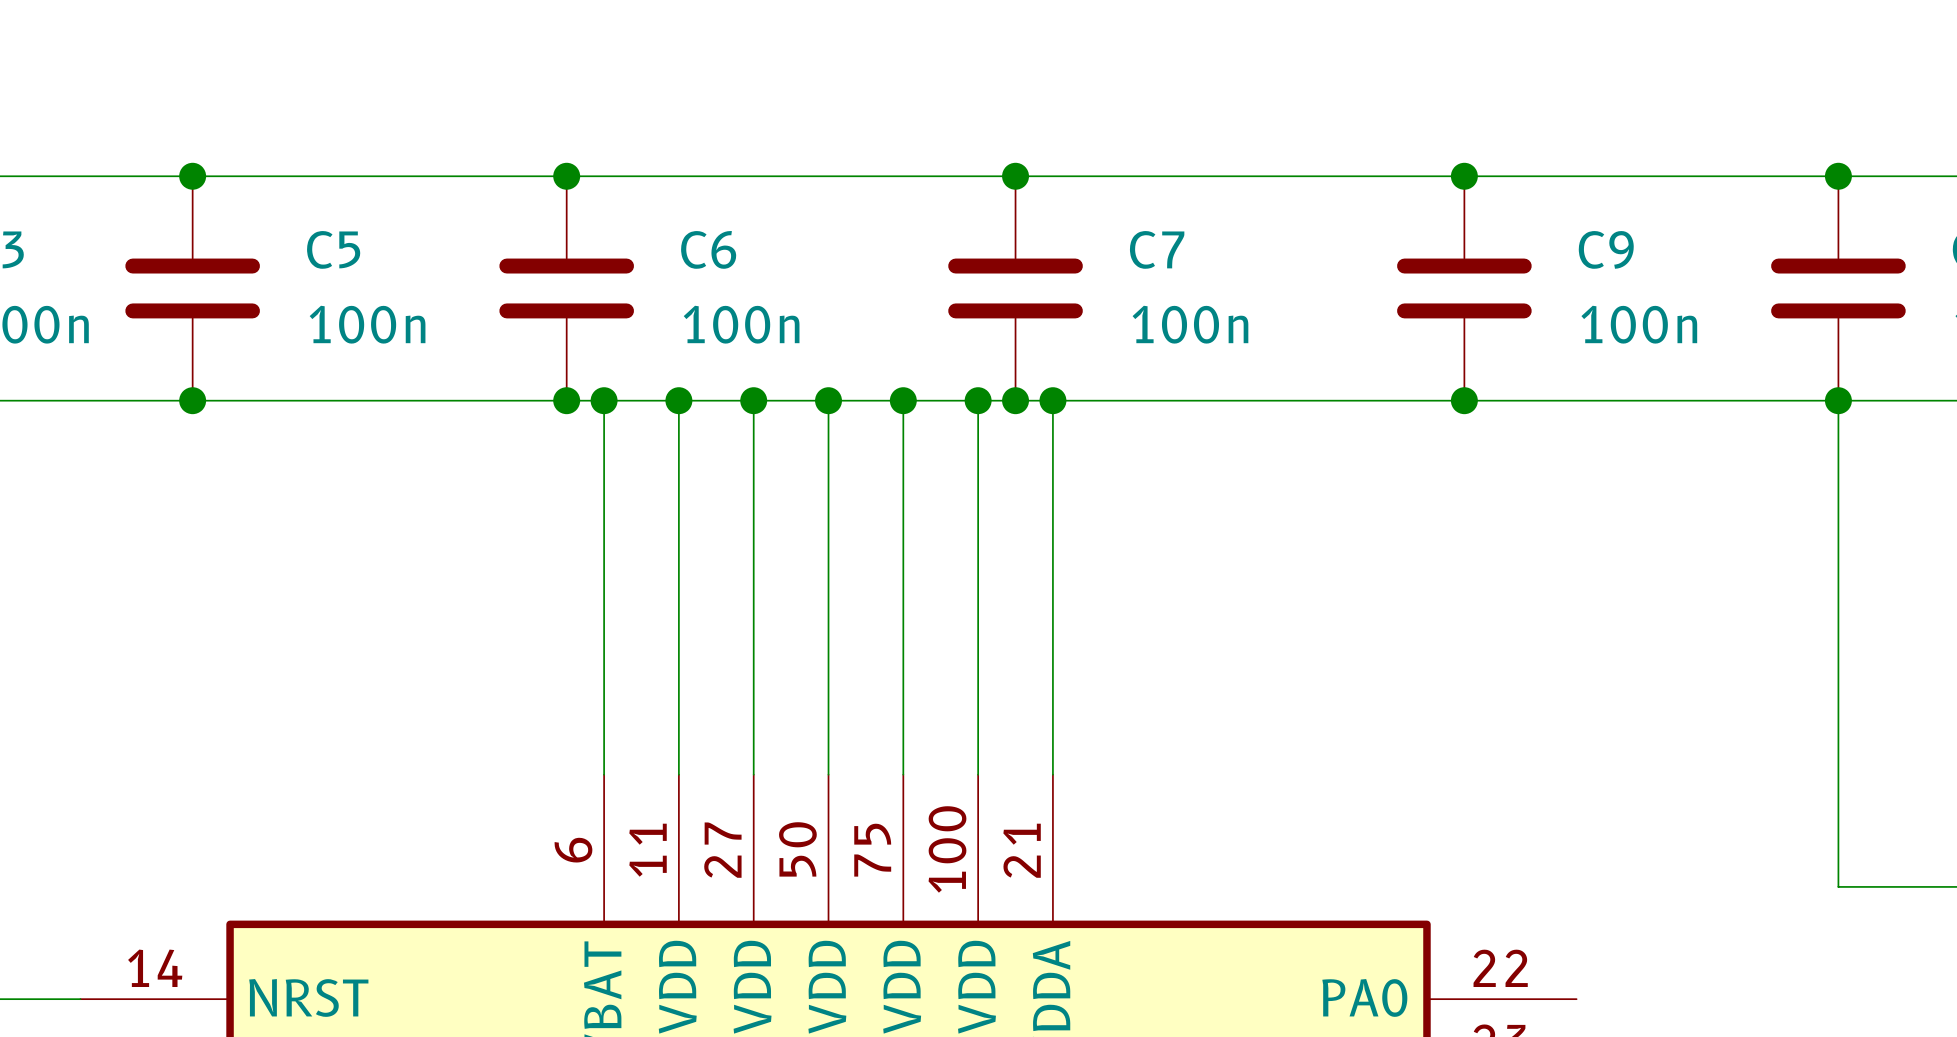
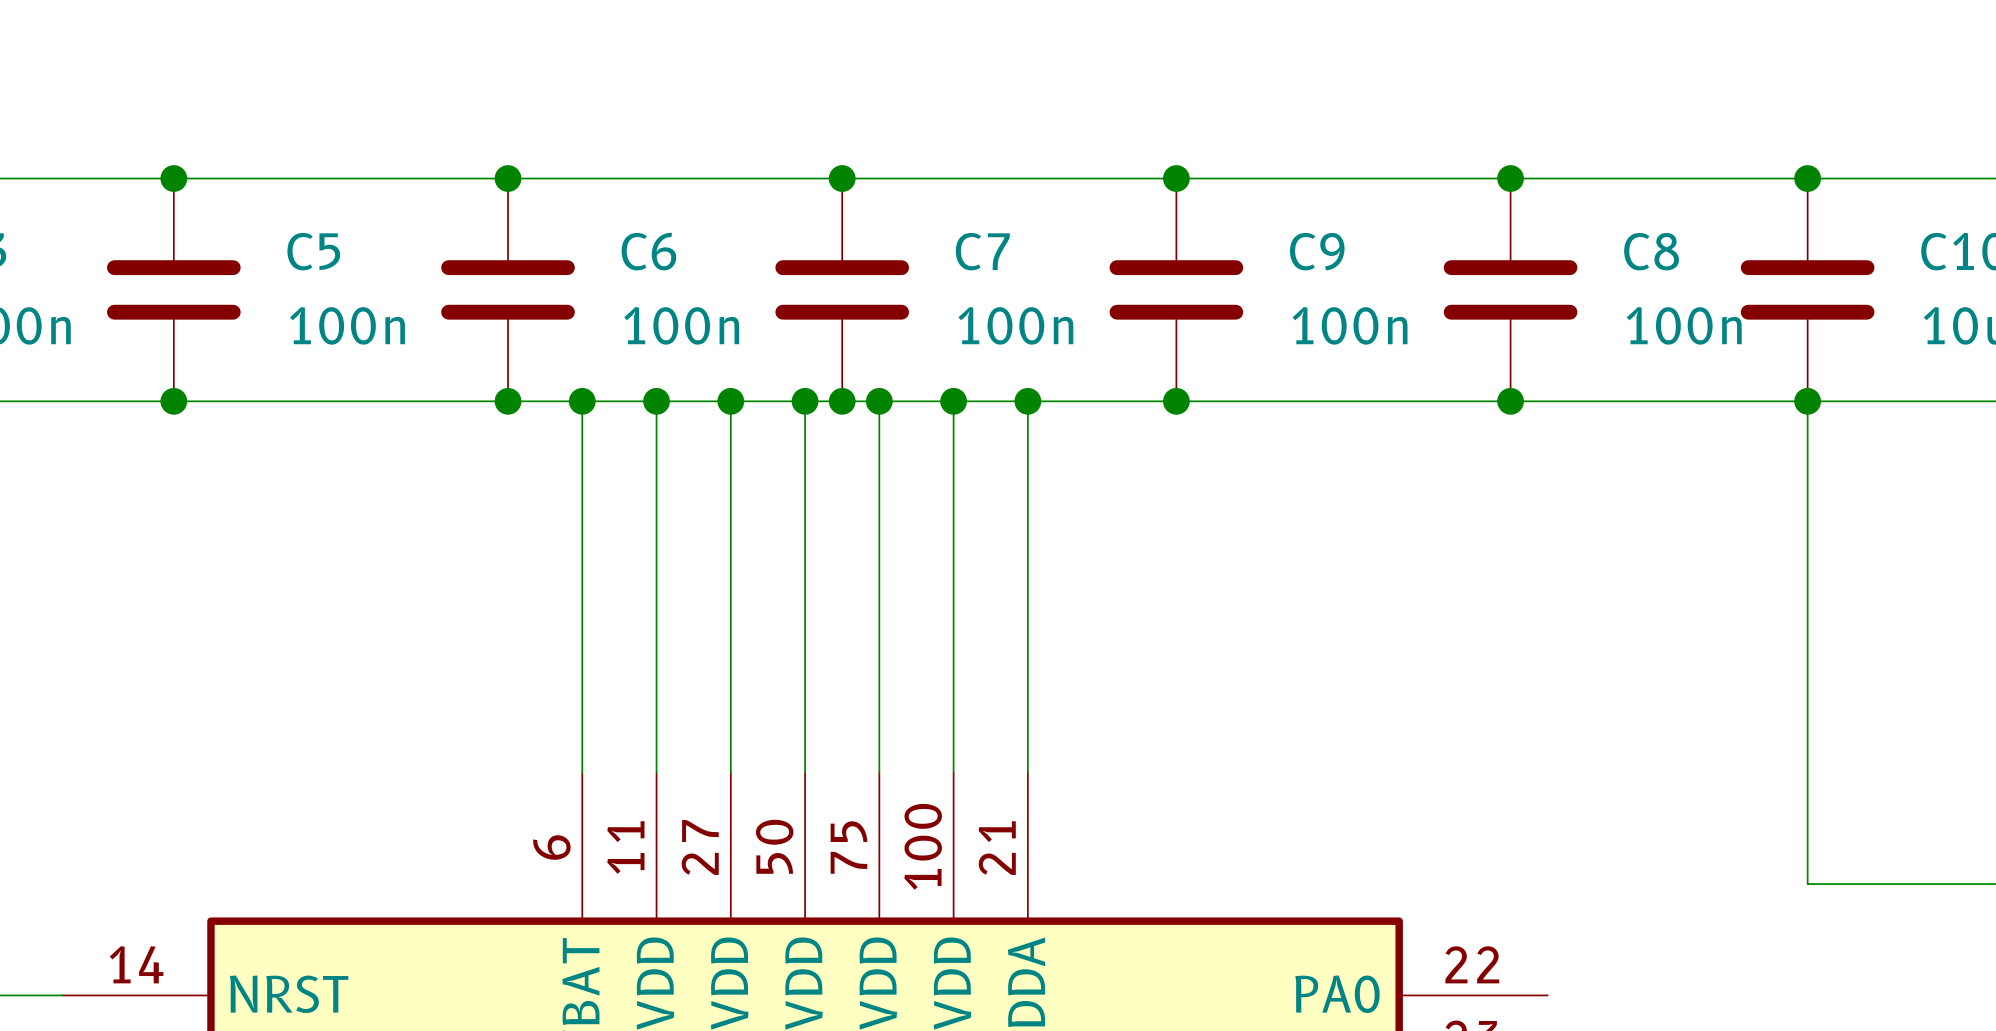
junction position: (566, 176) -> (508, 178)
junction: none -> (842, 178)
junction: (1015, 176) -> none
junction: none -> (1176, 178)
junction position: (1464, 176) -> (1510, 178)
C6 position: (566, 288) -> (508, 289)
C7 position: (1015, 288) -> (842, 289)
C9 position: (1464, 288) -> (1176, 289)
C8: none -> 100n (1510, 289)
junction position: (566, 400) -> (508, 401)
junction: none -> (842, 401)
junction: (1015, 400) -> none
junction: none -> (1176, 401)
junction position: (1464, 400) -> (1510, 401)

